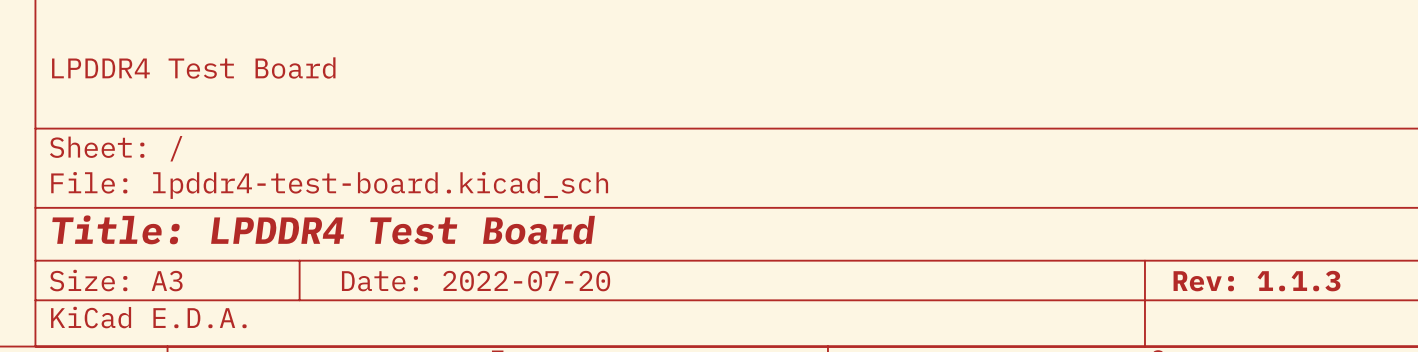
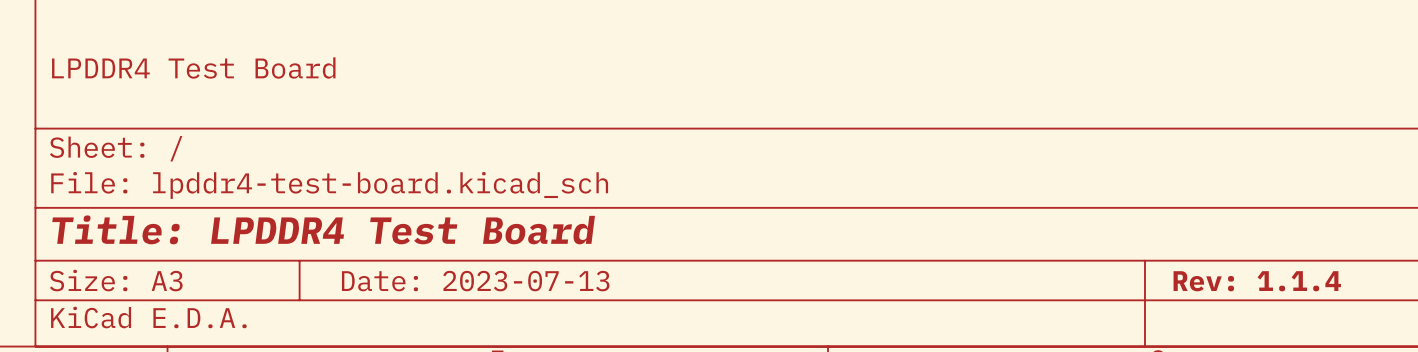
title block: Date: 2022-07-20 (476, 281) -> Date: 2023-07-13 (475, 281)
title block: Rev: 1.1.3 (1256, 281) -> Rev: 1.1.4 (1257, 281)

